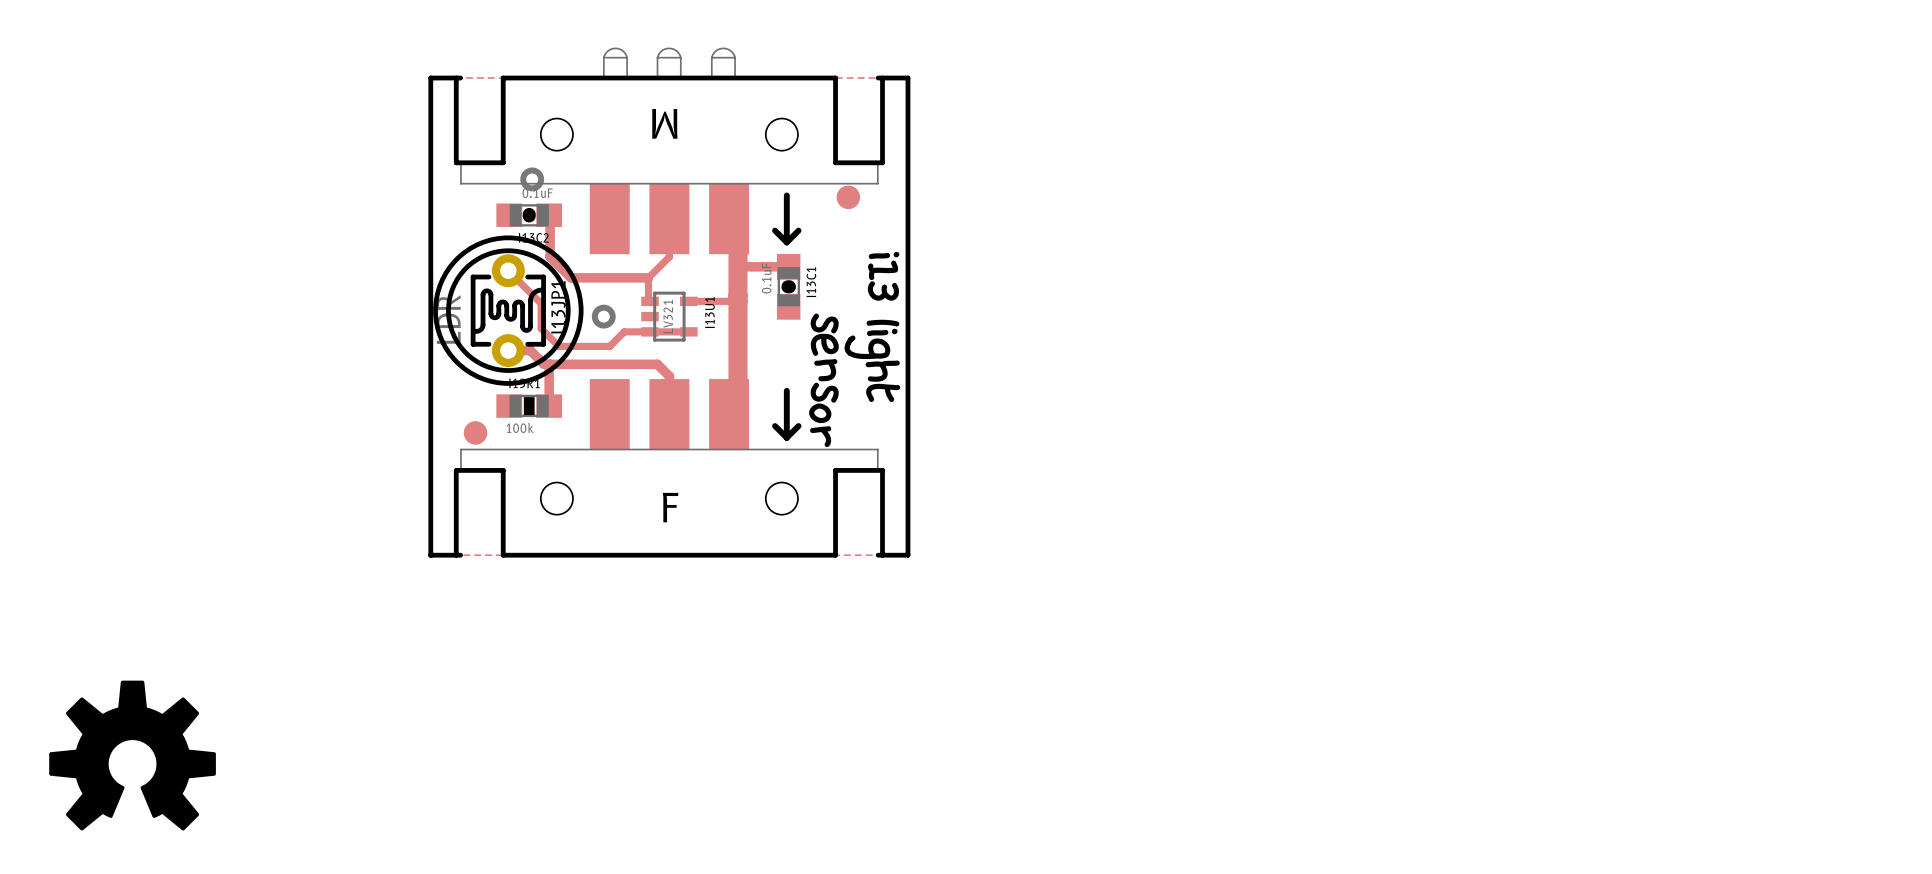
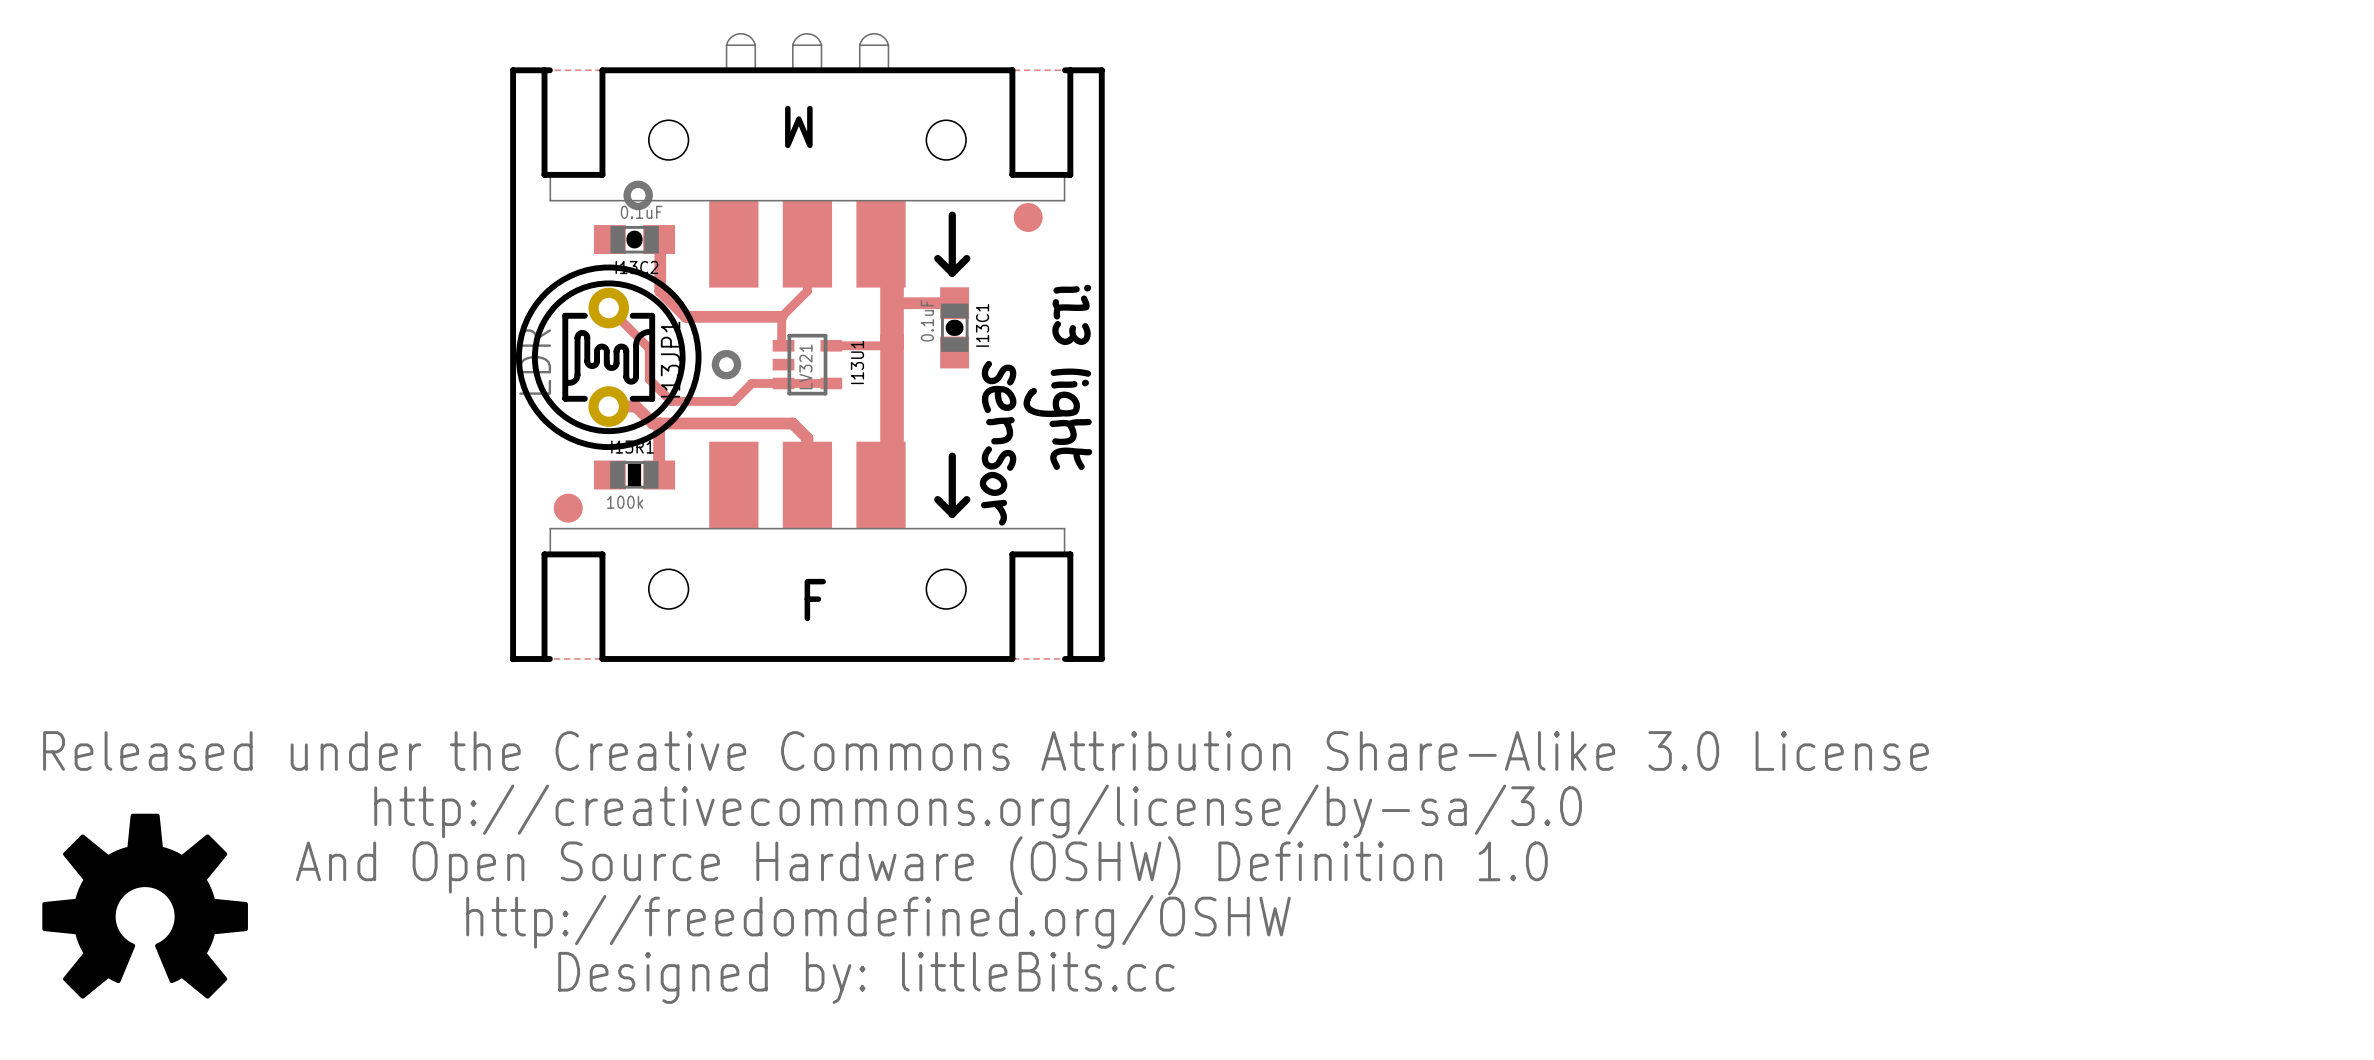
drawing: none -> [43, 731, 1929, 1004]

